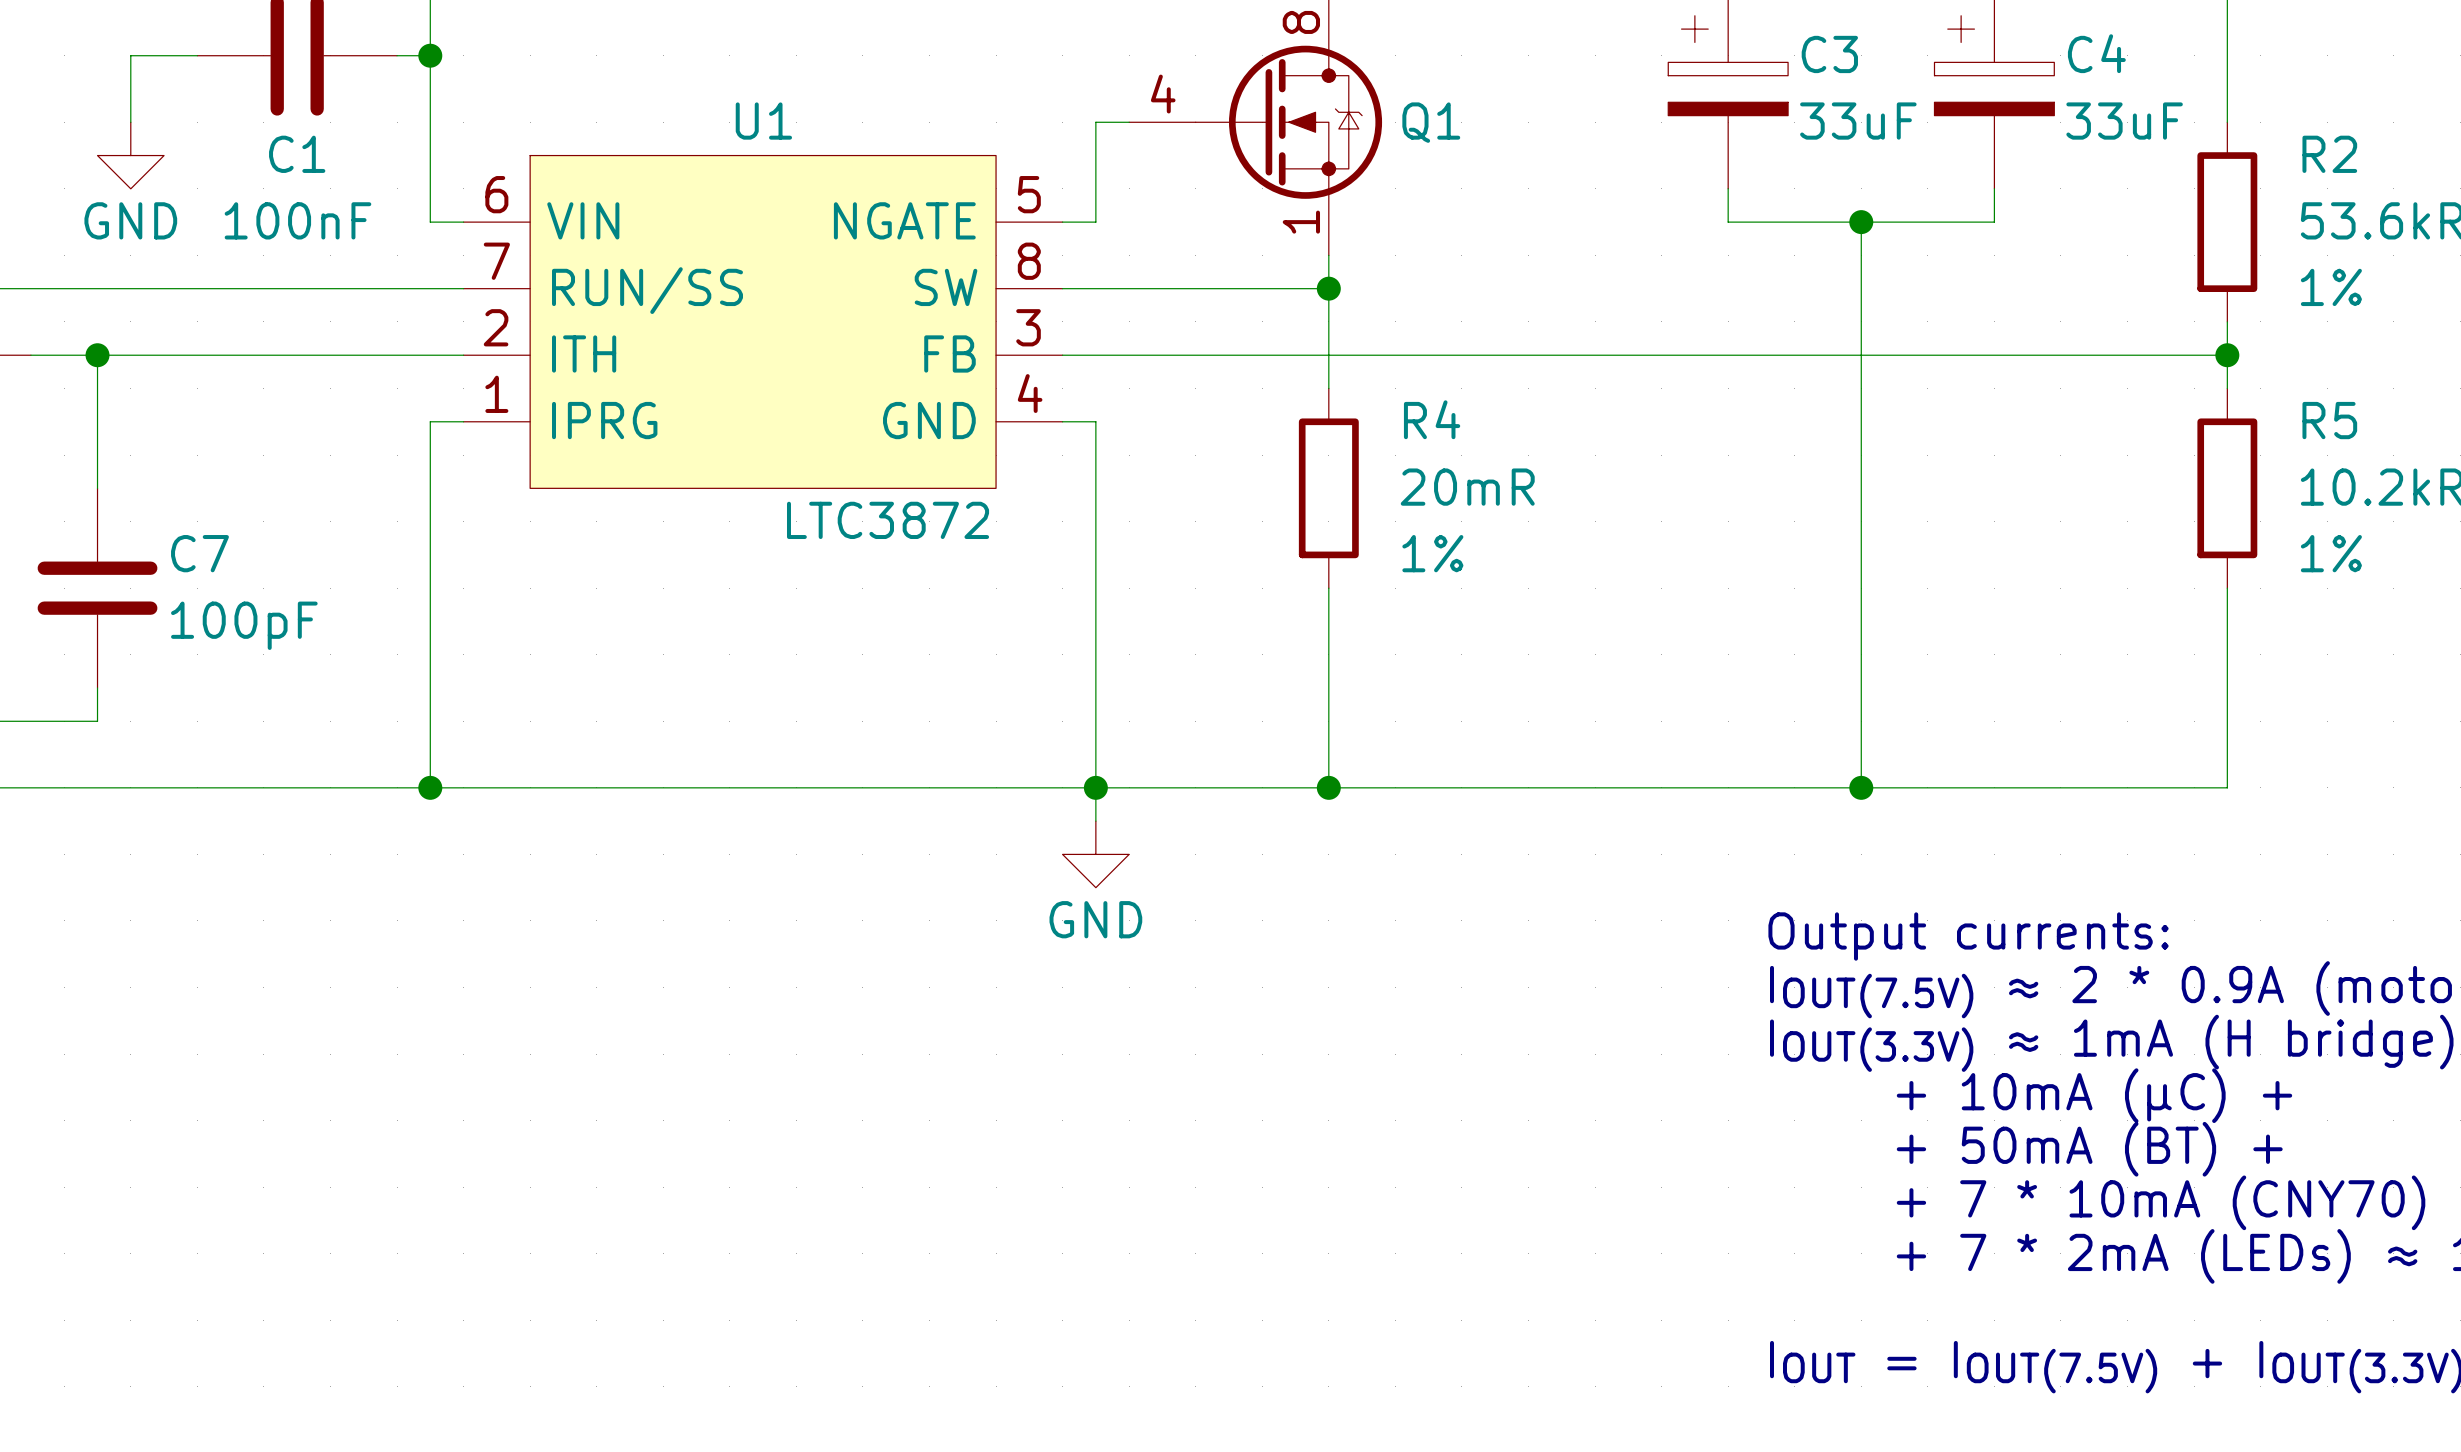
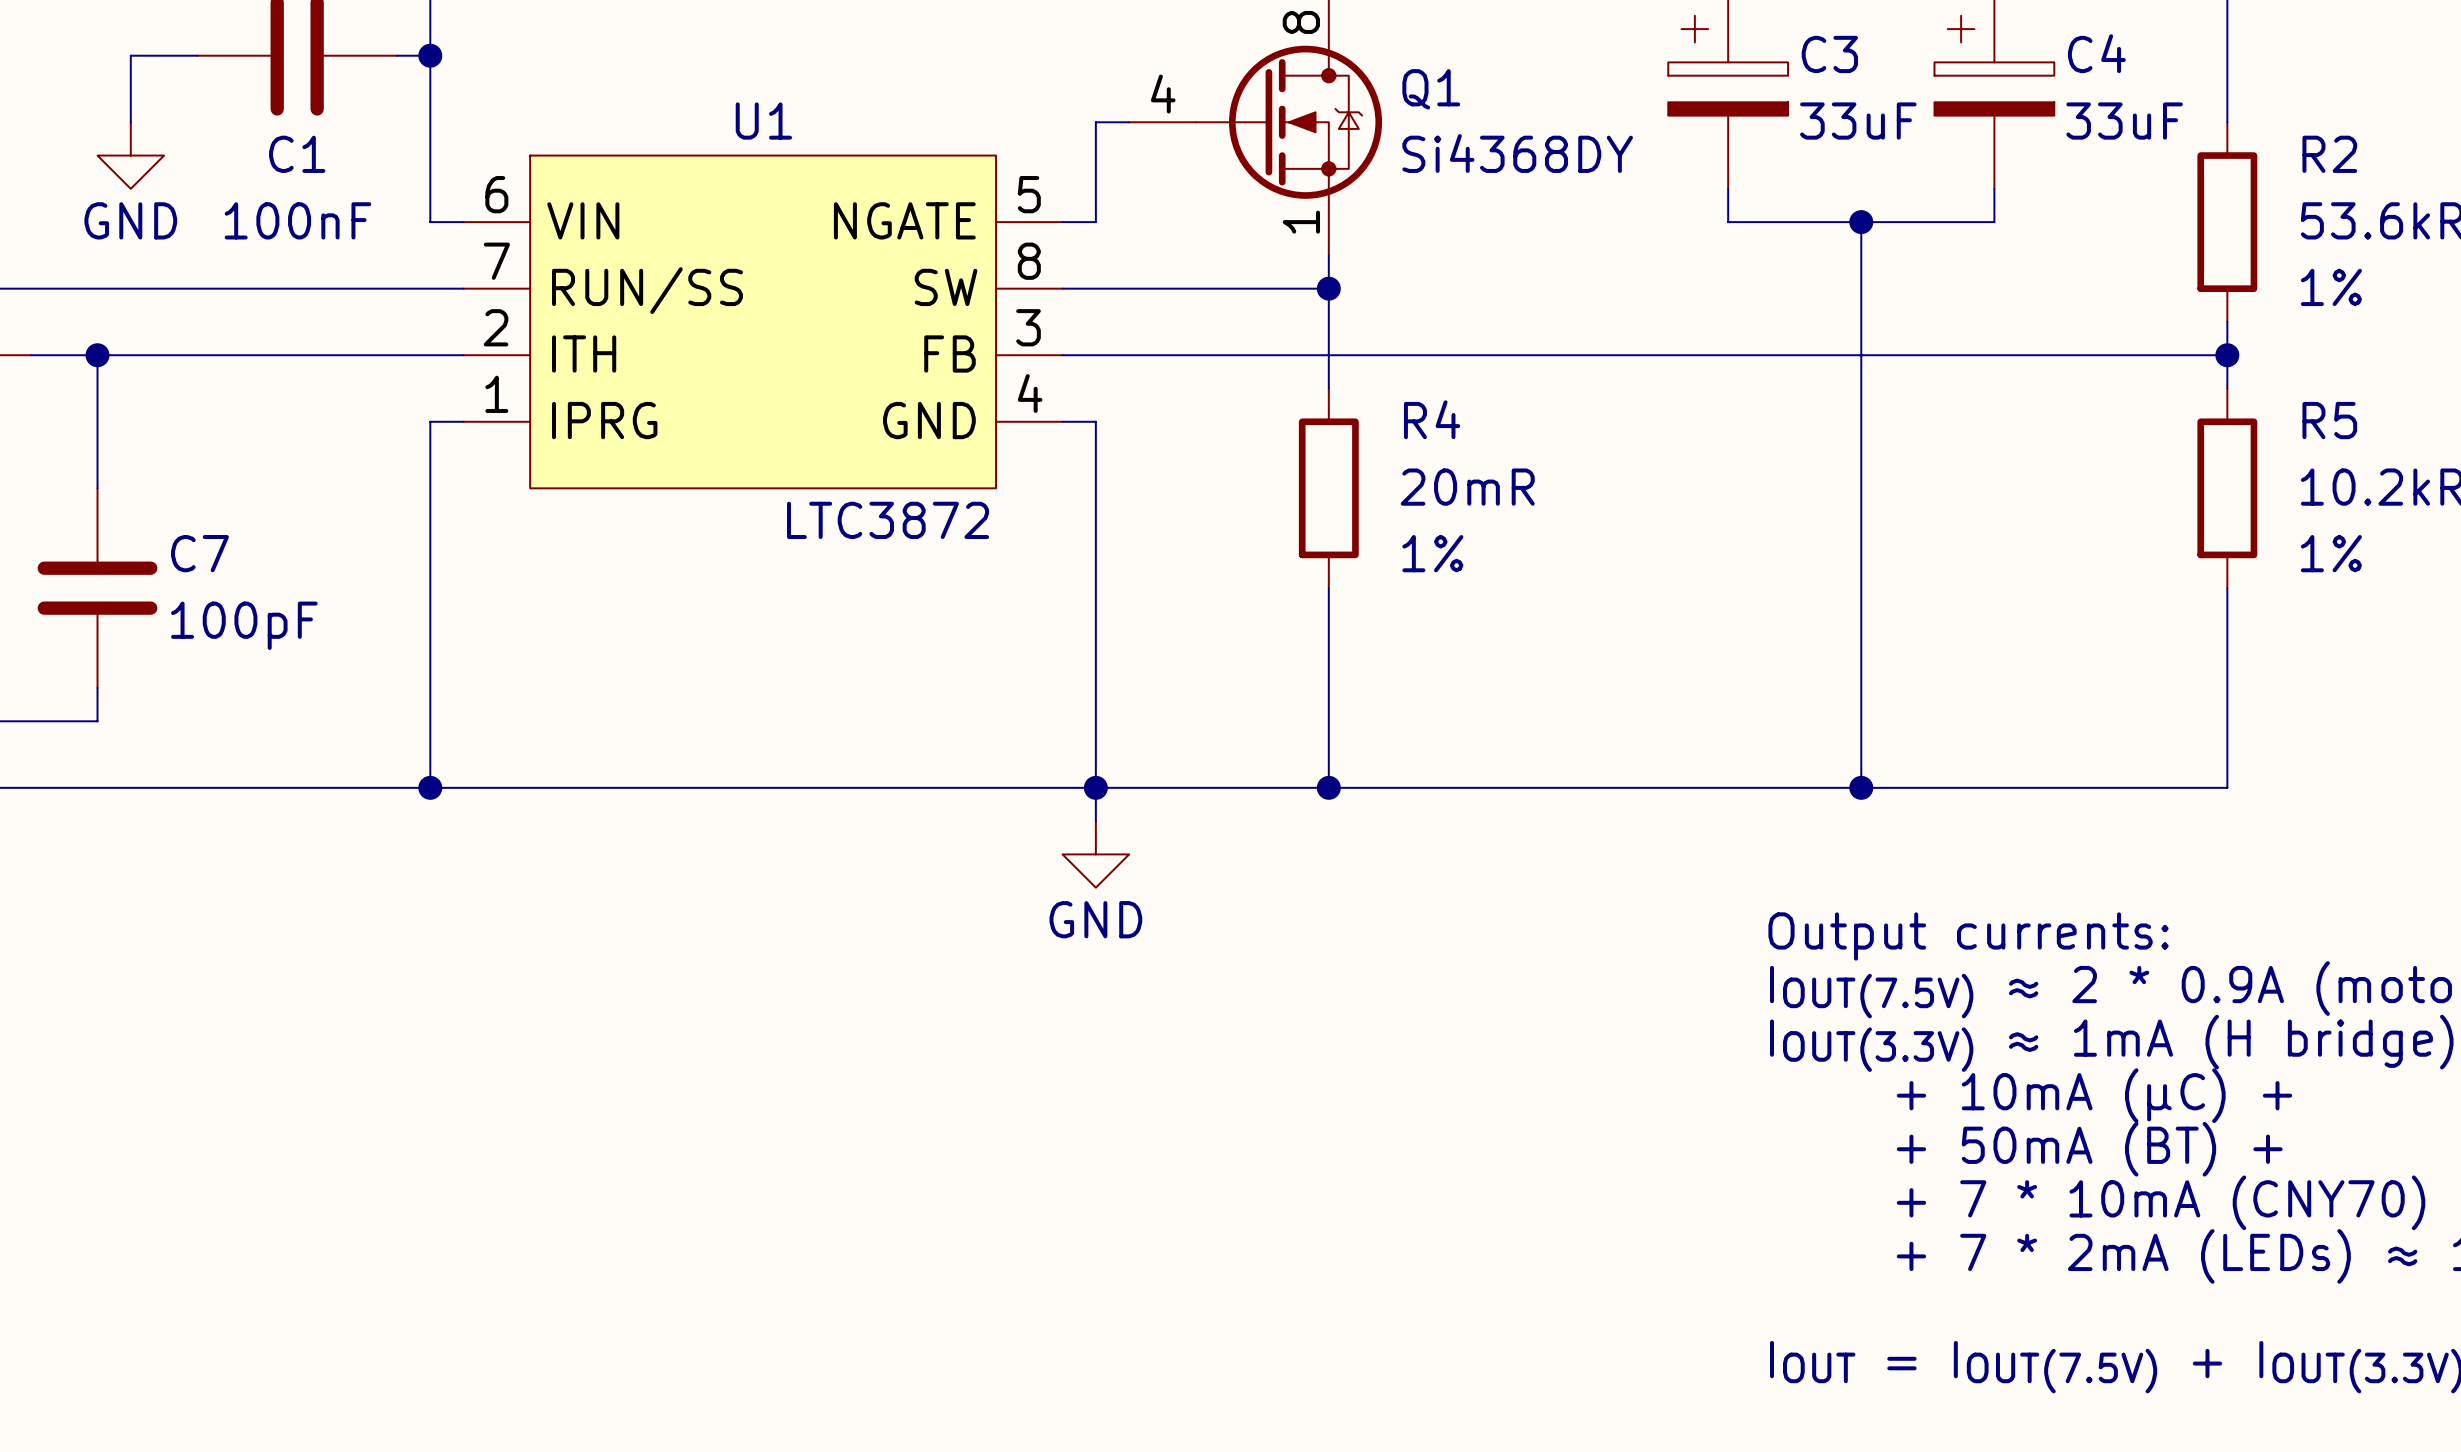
Q1 name position: Q1 (1431, 122) -> Q1 (1431, 89)
Q1 value: none -> Si4368DY (1517, 153)

